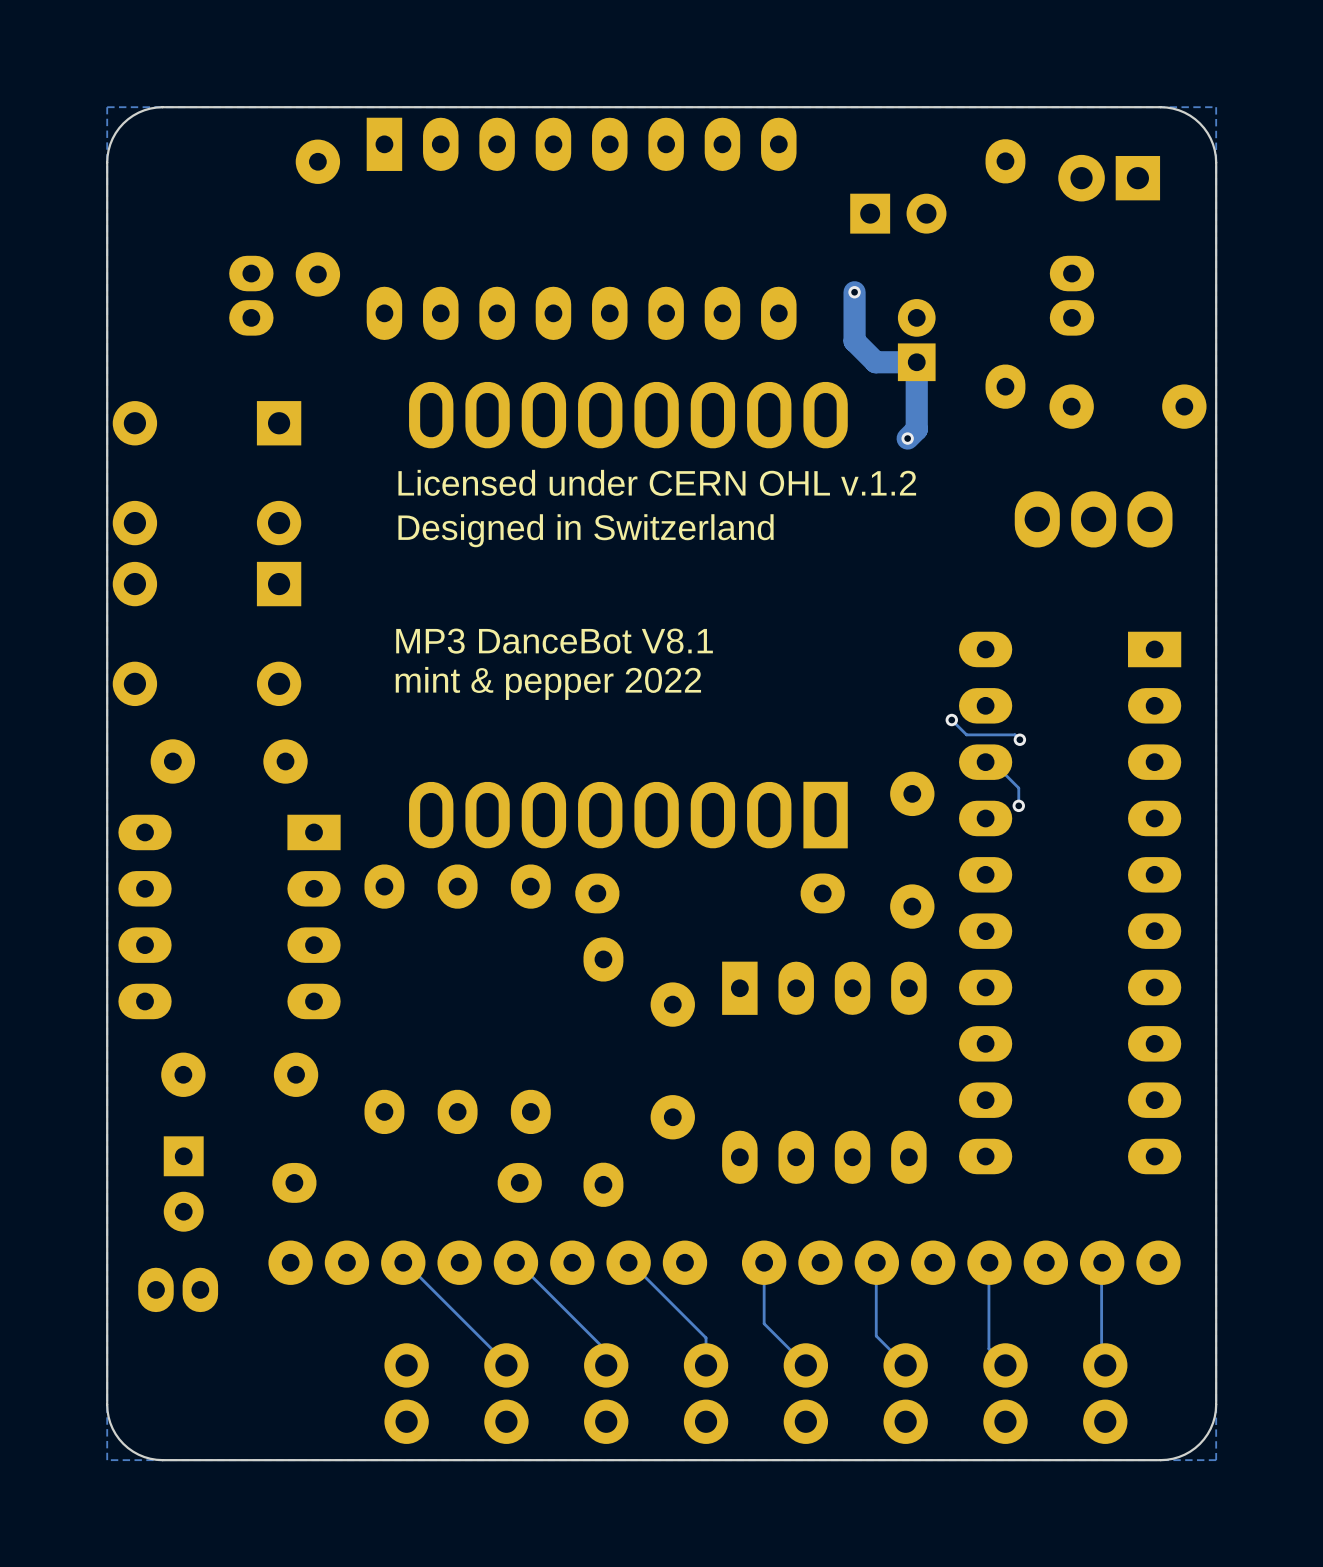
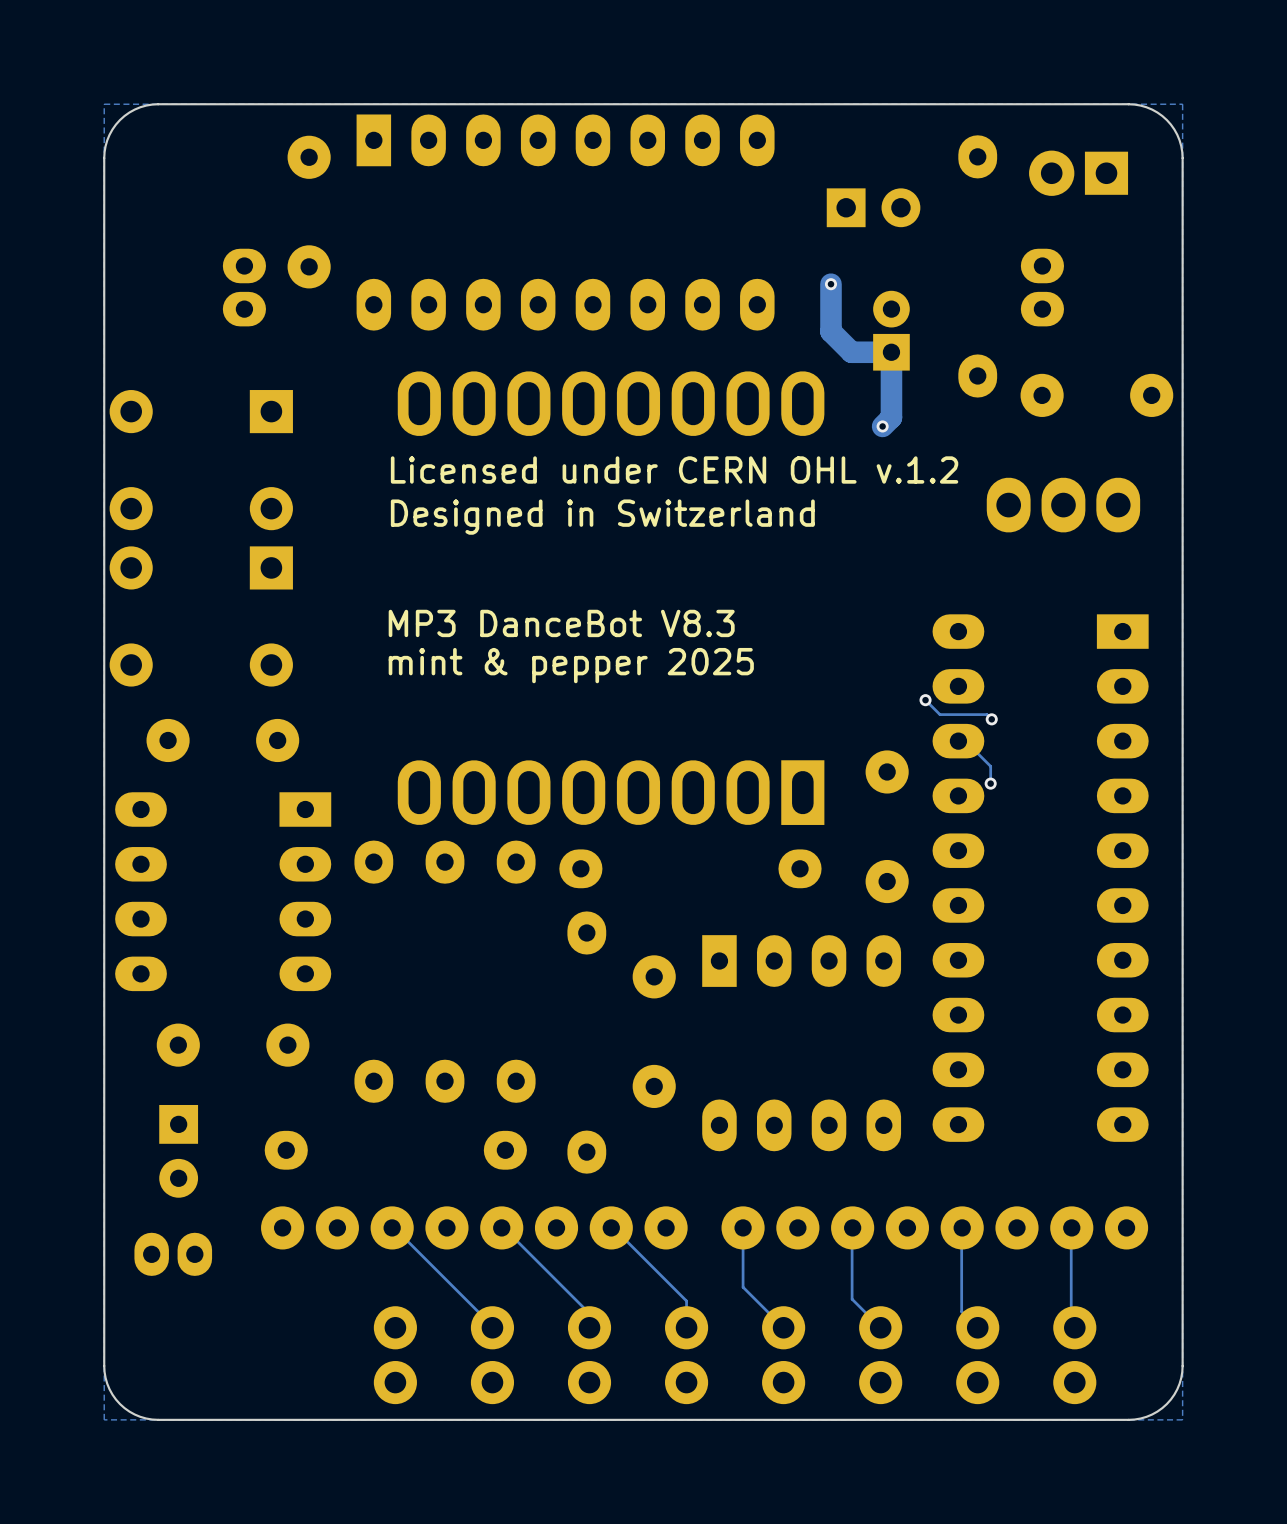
text: MP3 DanceBot V8.1 (554, 641) -> MP3 DanceBot V8.3 (561, 623)
text: mint & pepper 2022 (548, 683) -> mint & pepper 2025 (571, 665)

